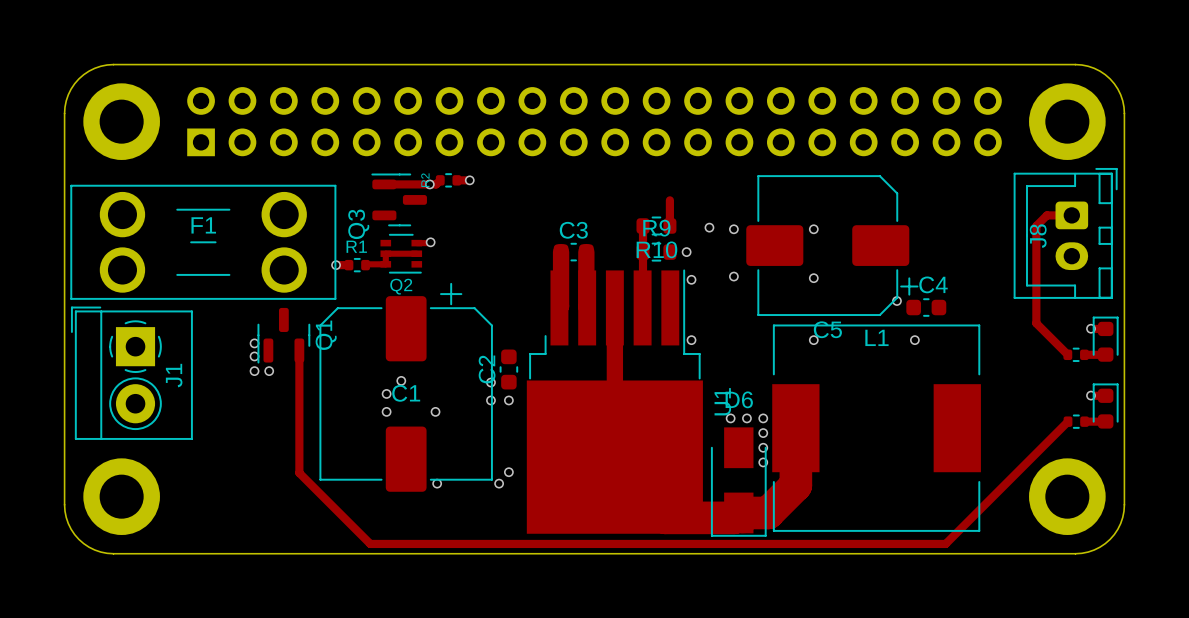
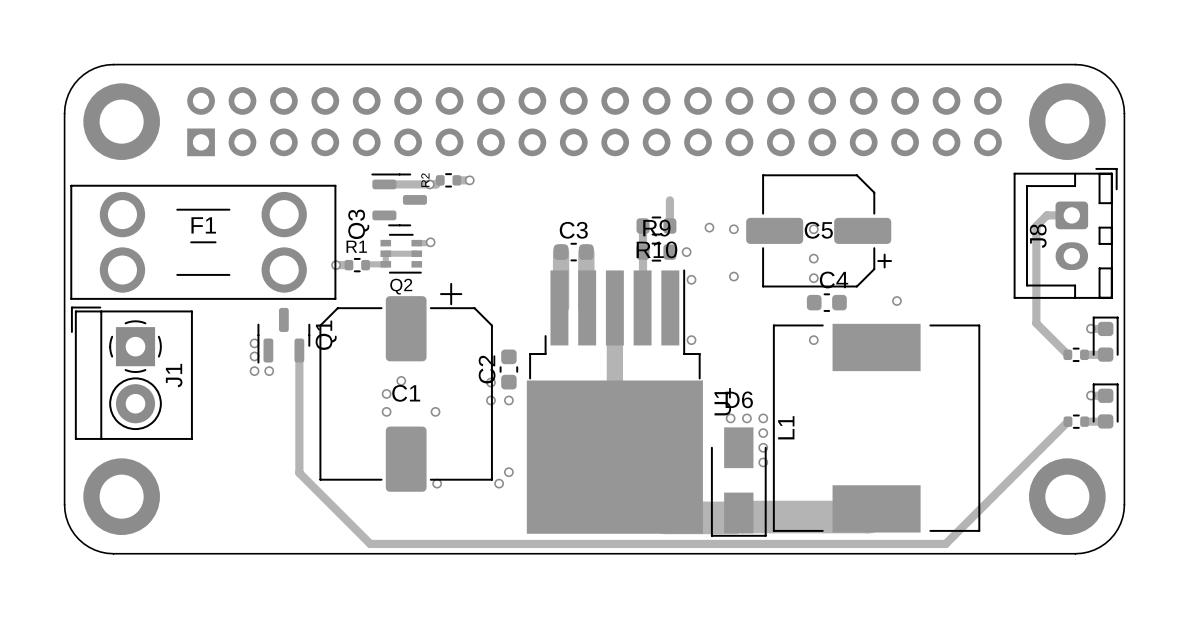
C5 footprint: [746, 175, 919, 317] -> [746, 174, 893, 288]
via: none -> (813, 258)
C4 position: (926, 307) -> (826, 302)
C5 name position: C5 (827, 329) -> C5 (818, 230)
L1 name position: L1 (876, 337) -> L1 (786, 427)
via: (914, 340) -> none
track: (795, 428) (795, 485) (768, 512) (738, 512) -> none
L1 rotation: 0° (876, 428) -> 90° clockwise (876, 428)
track: none -> (876, 508) (868, 517) (742, 517)

